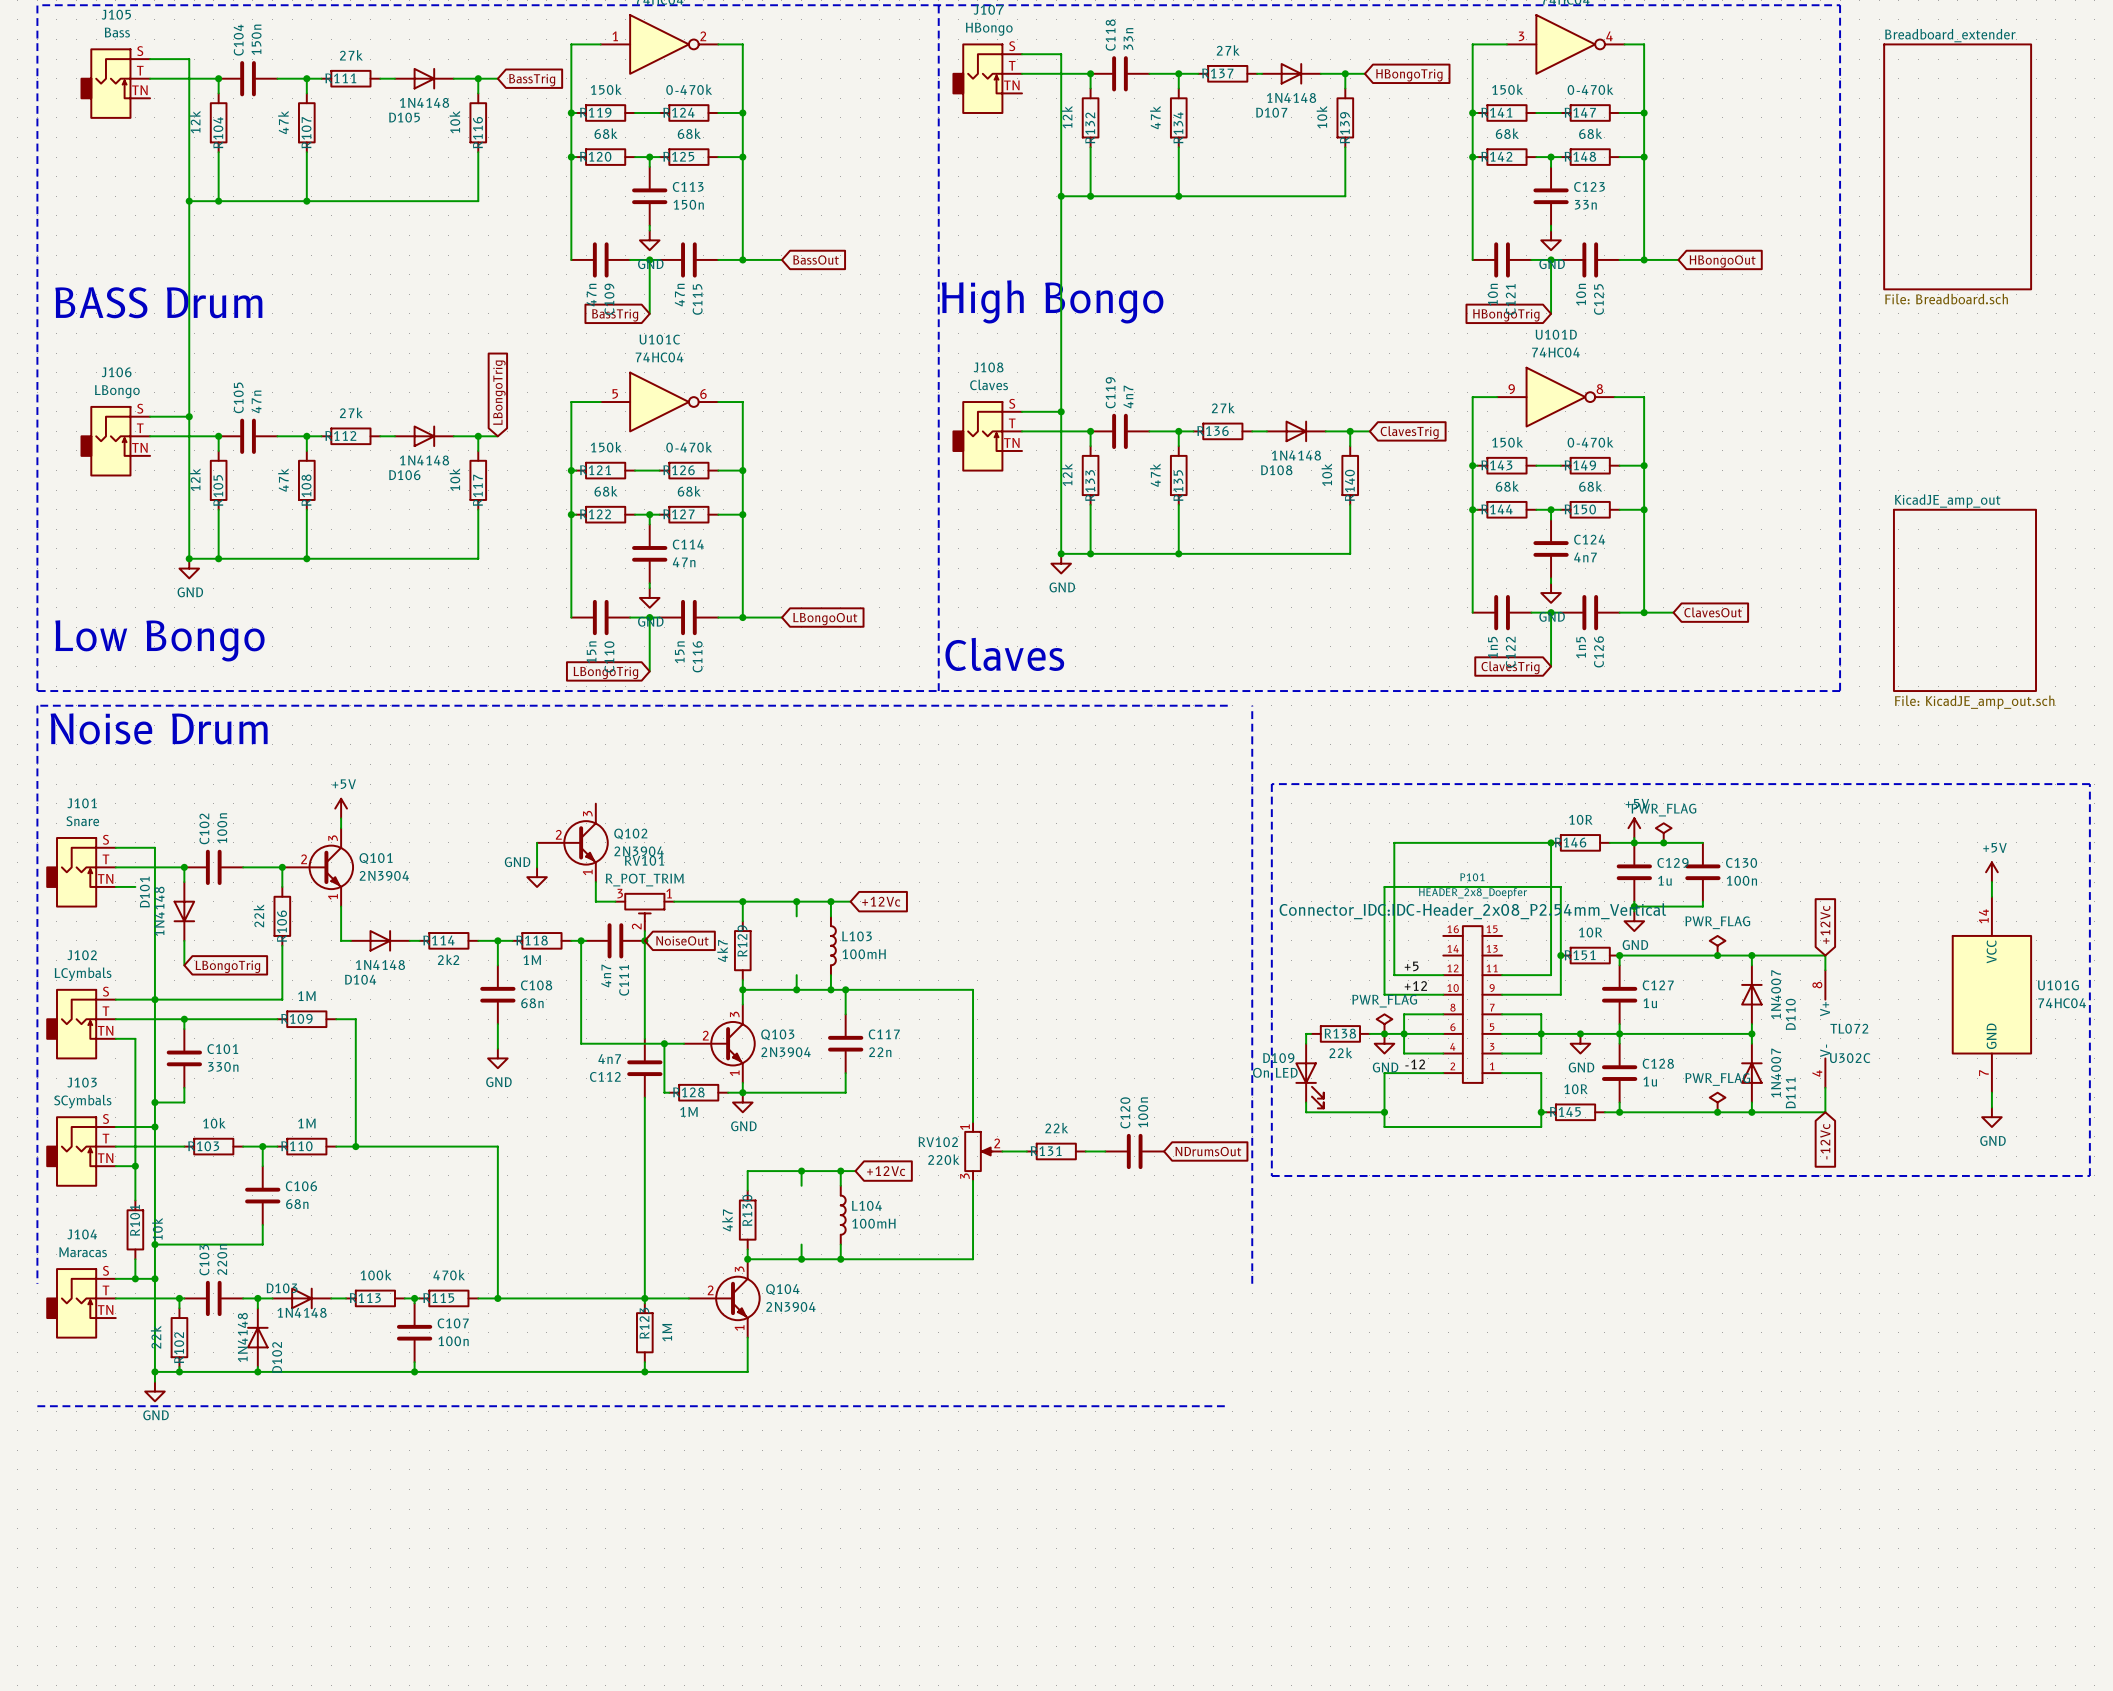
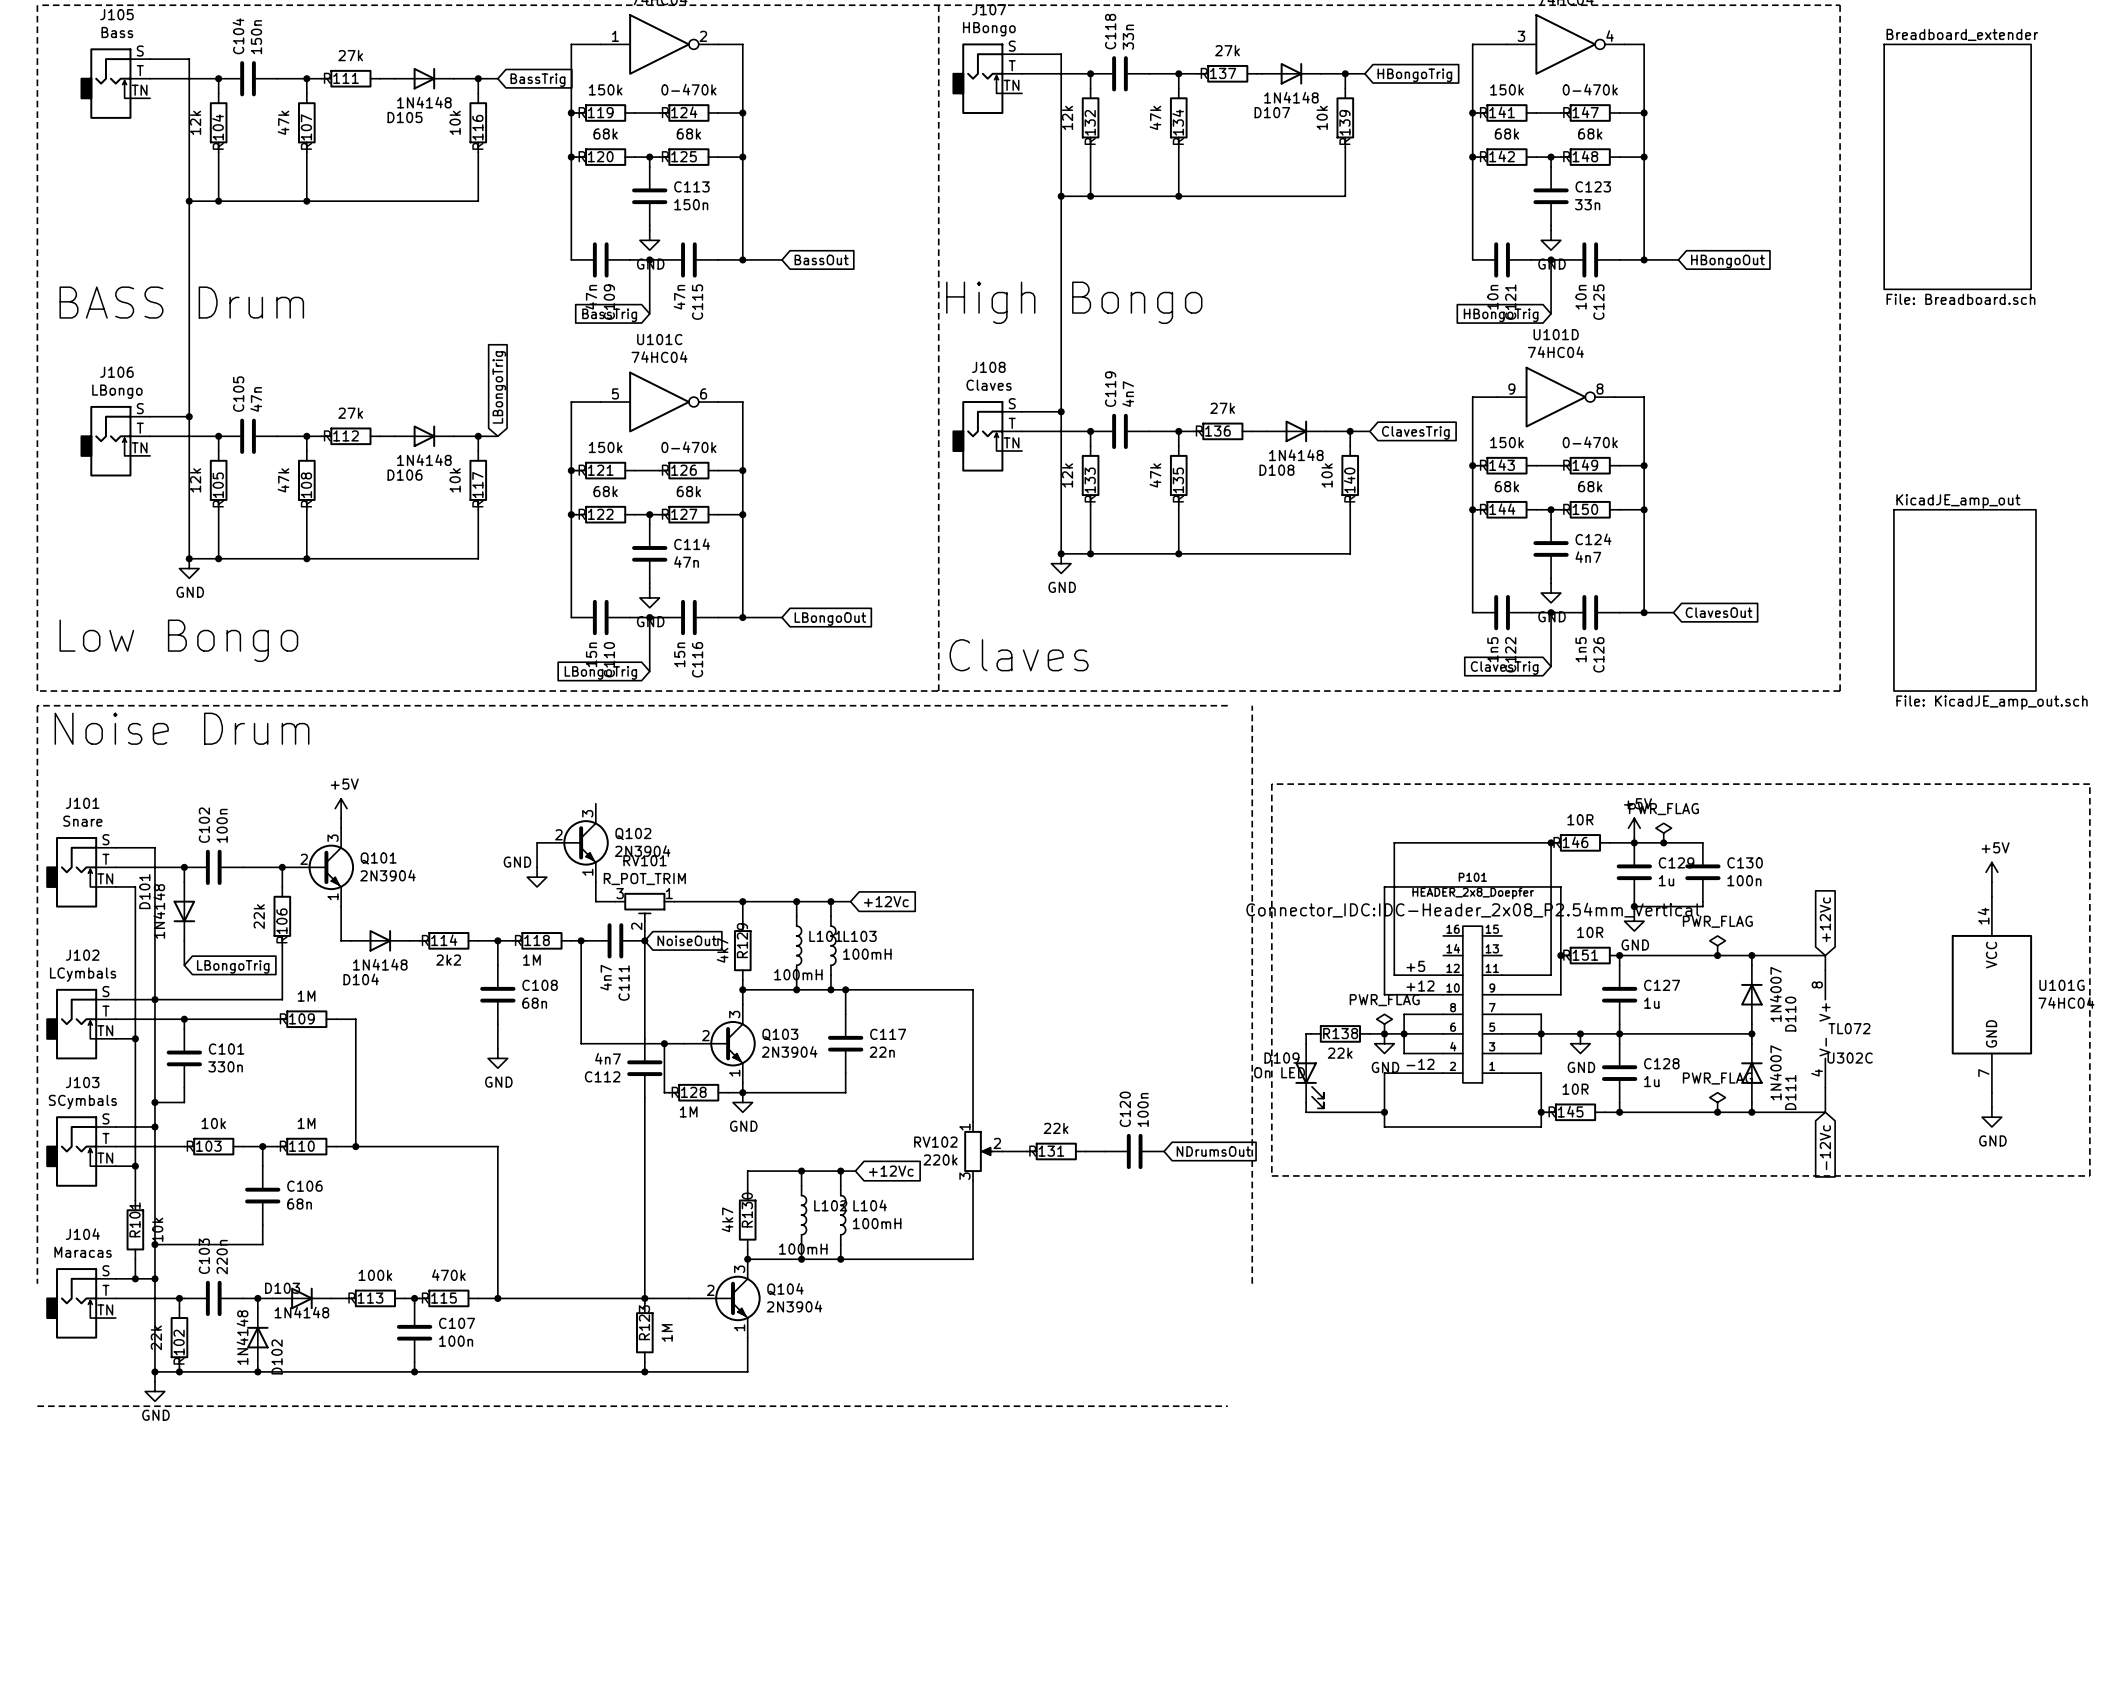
wire: none -> (135, 886) (135, 1038)
L101: none -> 100mH (799, 945)
junction: none -> (135, 1038)
L102: none -> 100mH (804, 1215)

